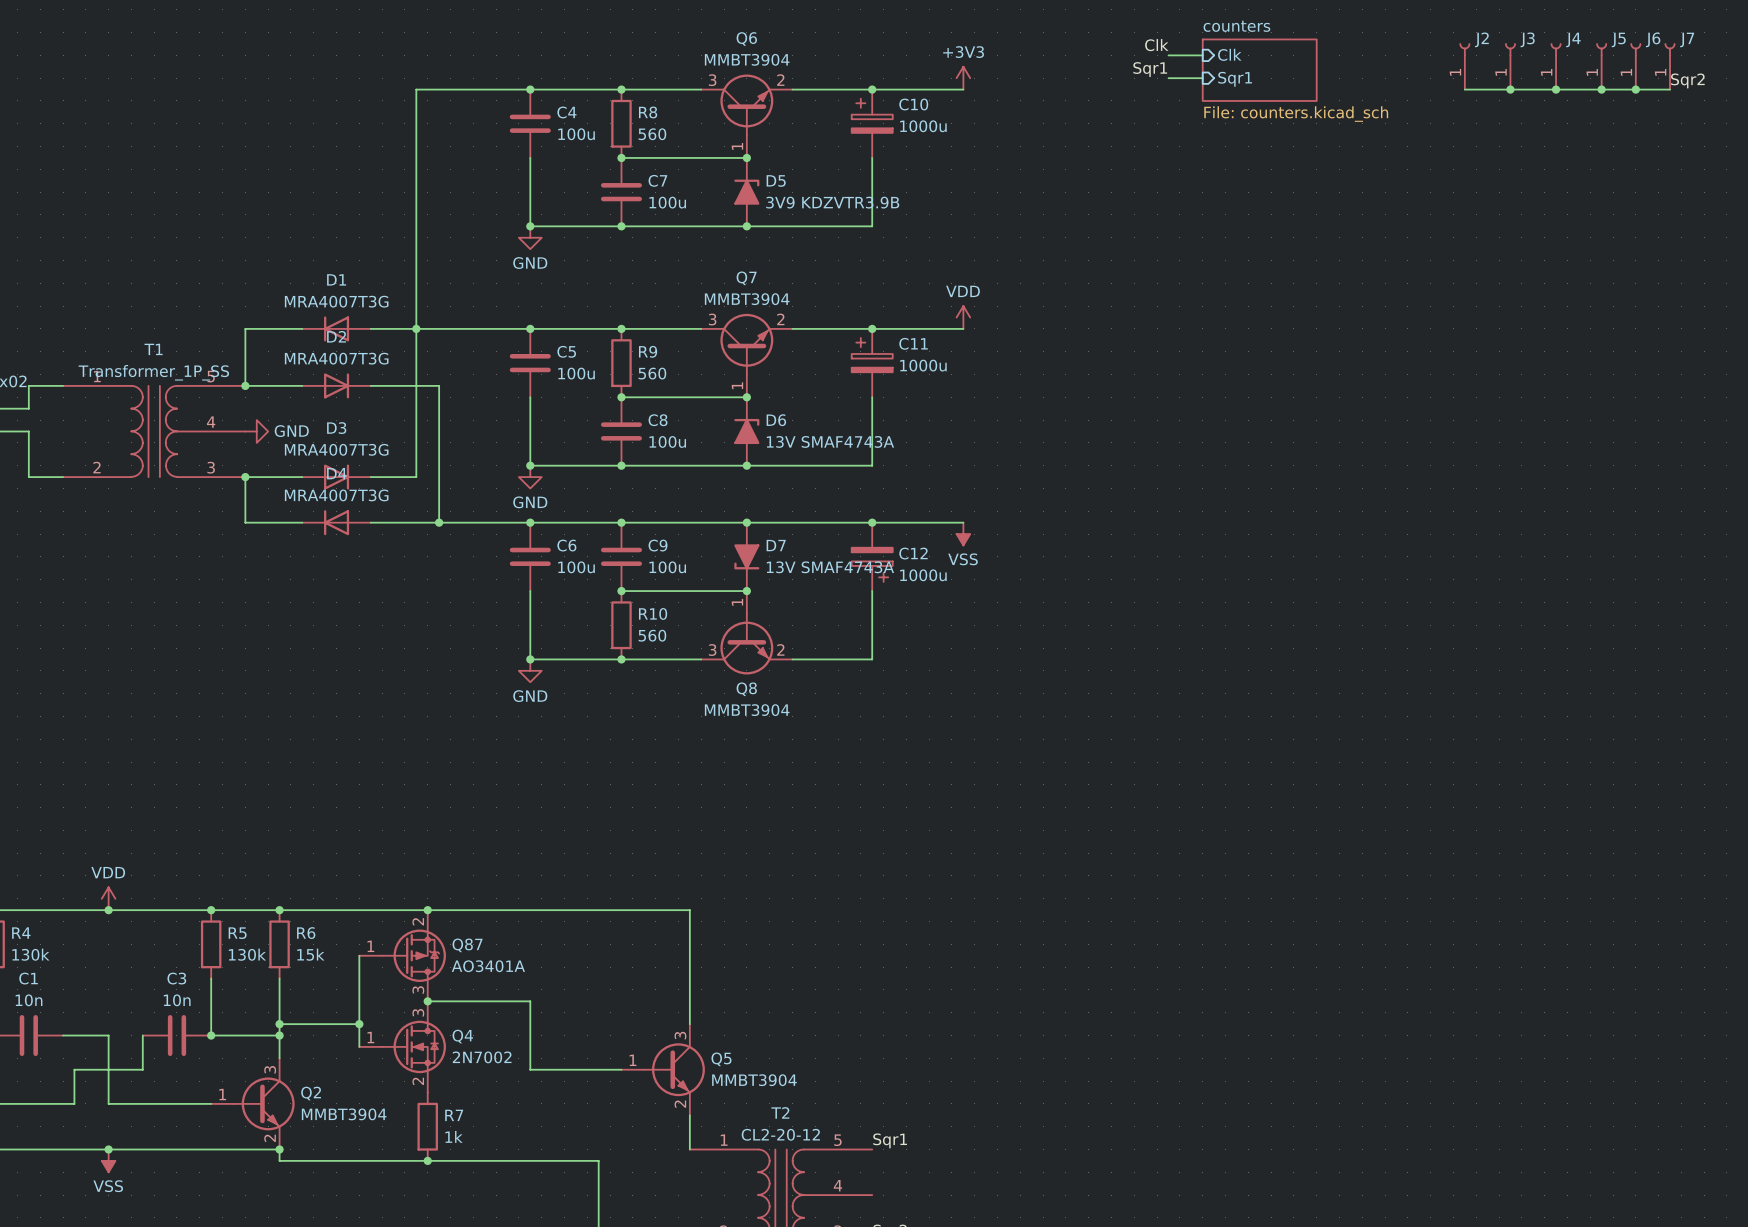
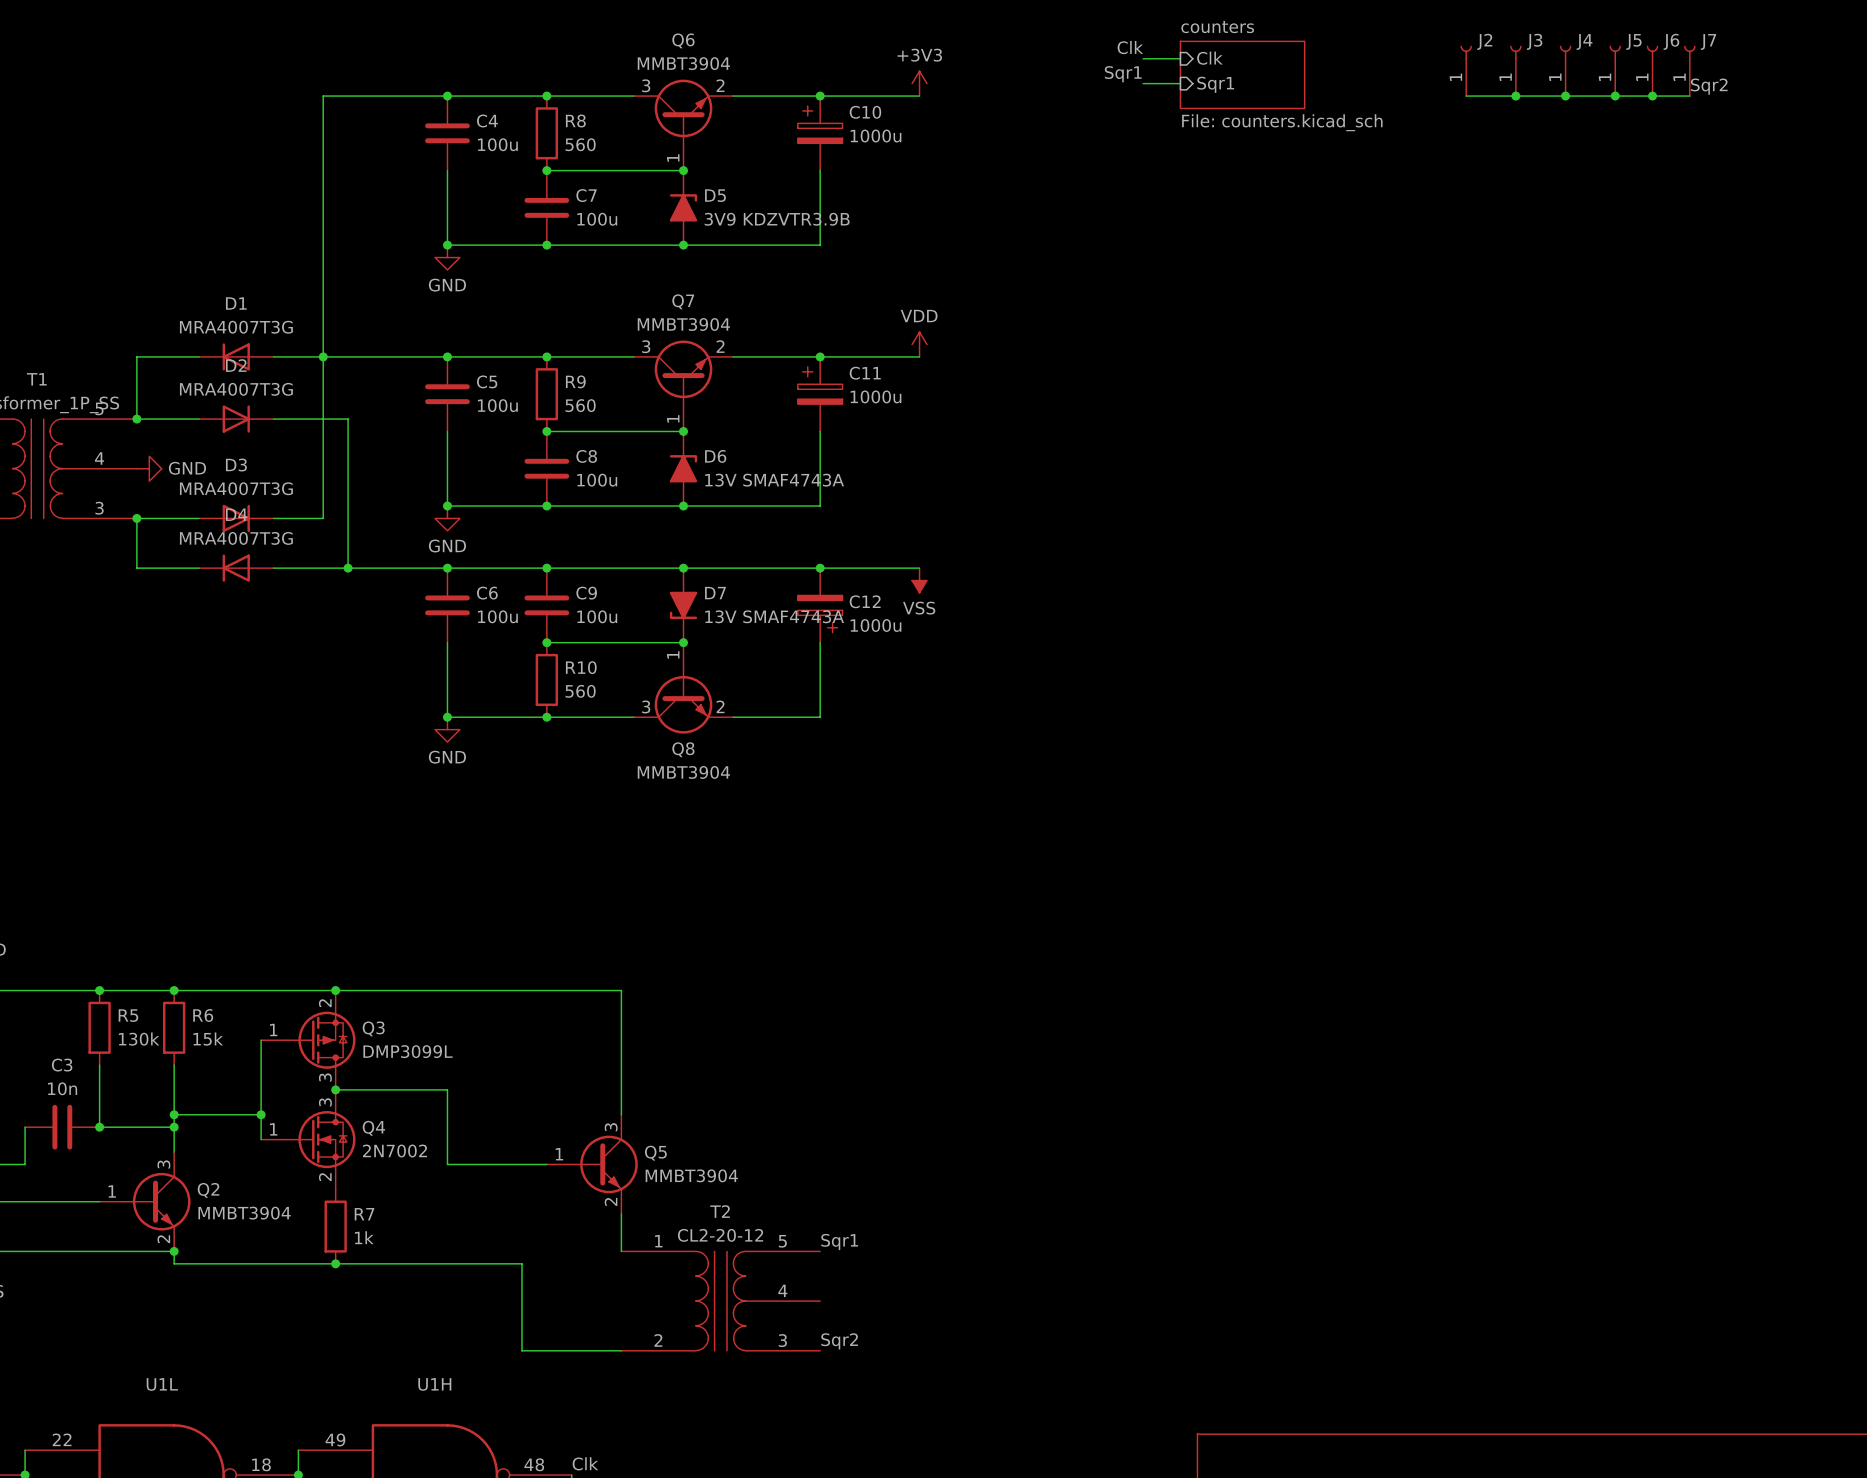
Q87: AO3401A (402, 955) -> none
Q3: none -> DMP3099L (308, 1040)

